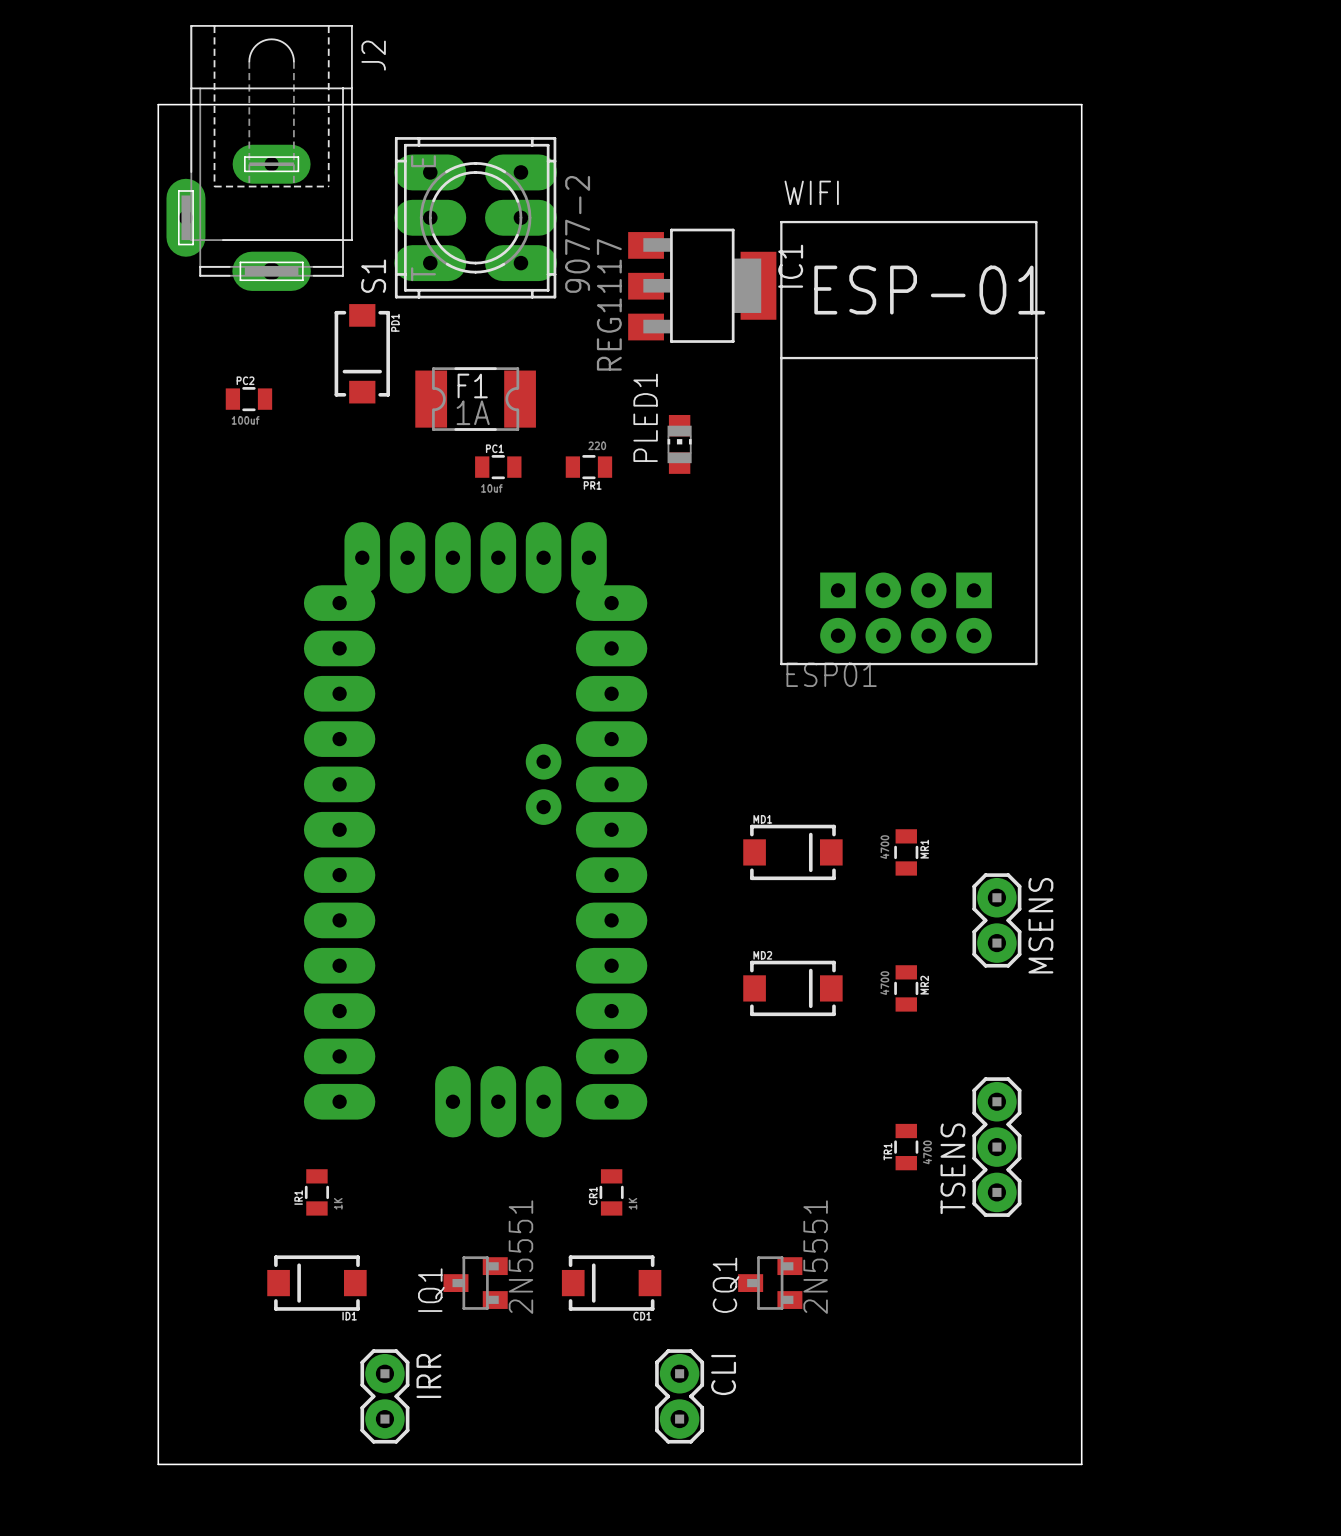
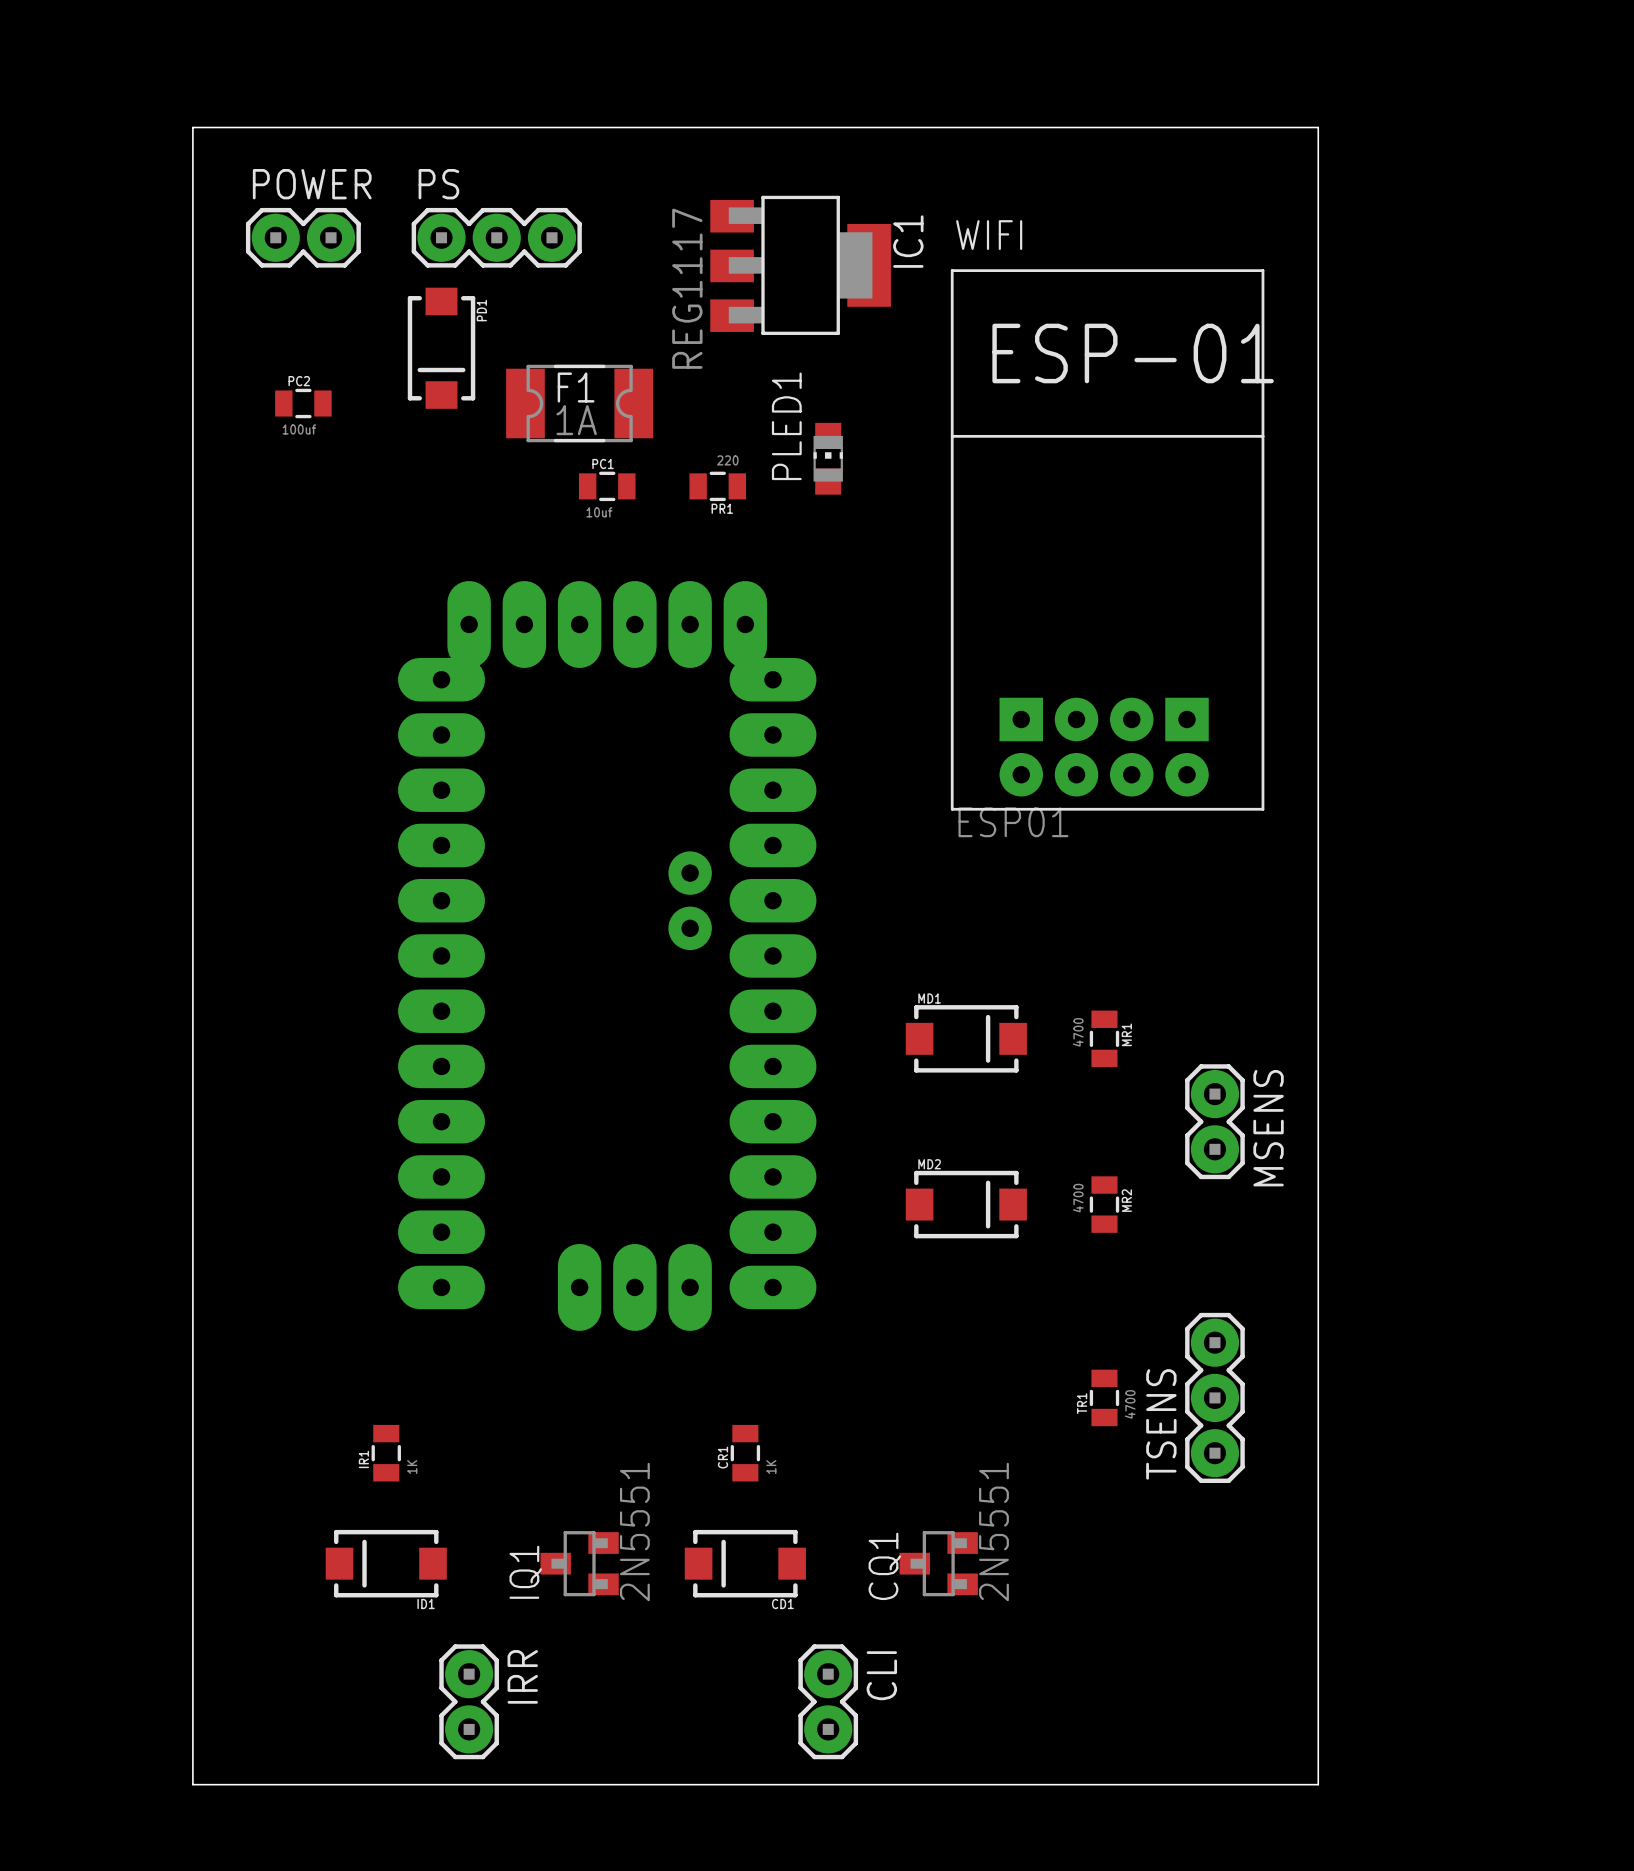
J2: (259, 157) -> none
POWER: none -> (303, 237)
PS: none -> (496, 237)
S1: 9077-2 (475, 217) -> none
IC1 position: (702, 285) -> (800, 265)
PD1 position: (362, 353) -> (441, 348)
PC2 position: (248, 399) -> (303, 403)
F1 position: (475, 399) -> (579, 403)
PLED1 position: (679, 444) -> (828, 458)
PC1 position: (498, 467) -> (607, 486)
PR1 position: (588, 467) -> (717, 486)
part position: (475, 829) -> (607, 955)

